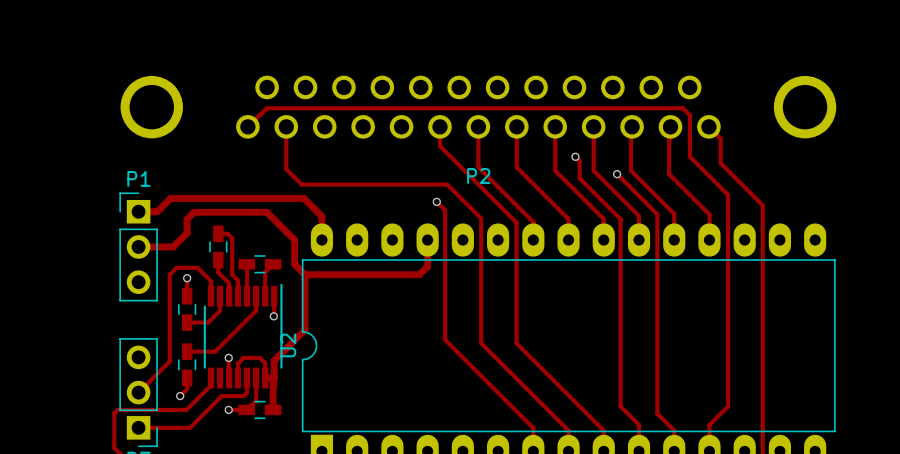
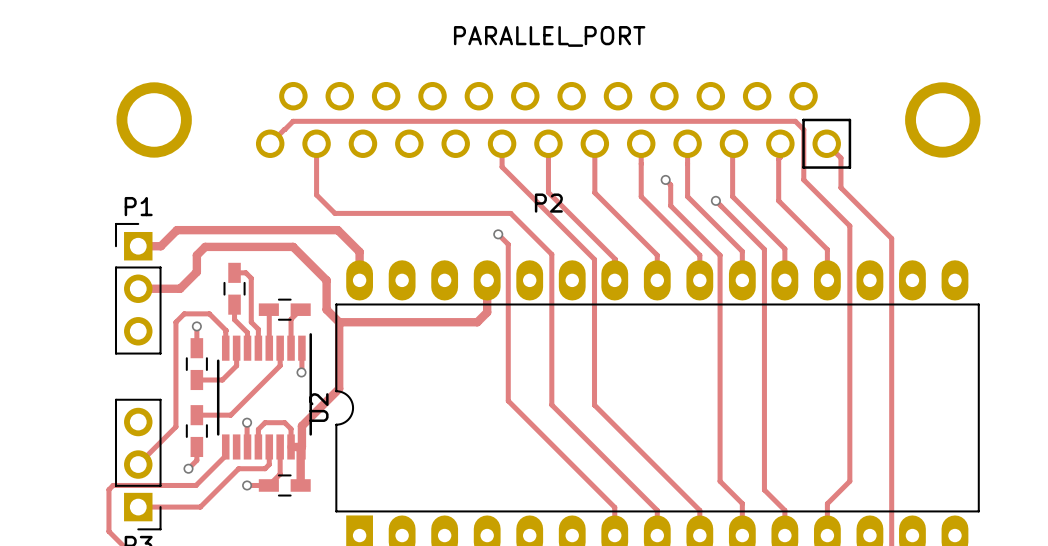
P2 value: none -> PARALLEL_PORT (549, 36)
P2 footprint: [120, 75, 837, 139] -> [116, 81, 981, 169]

